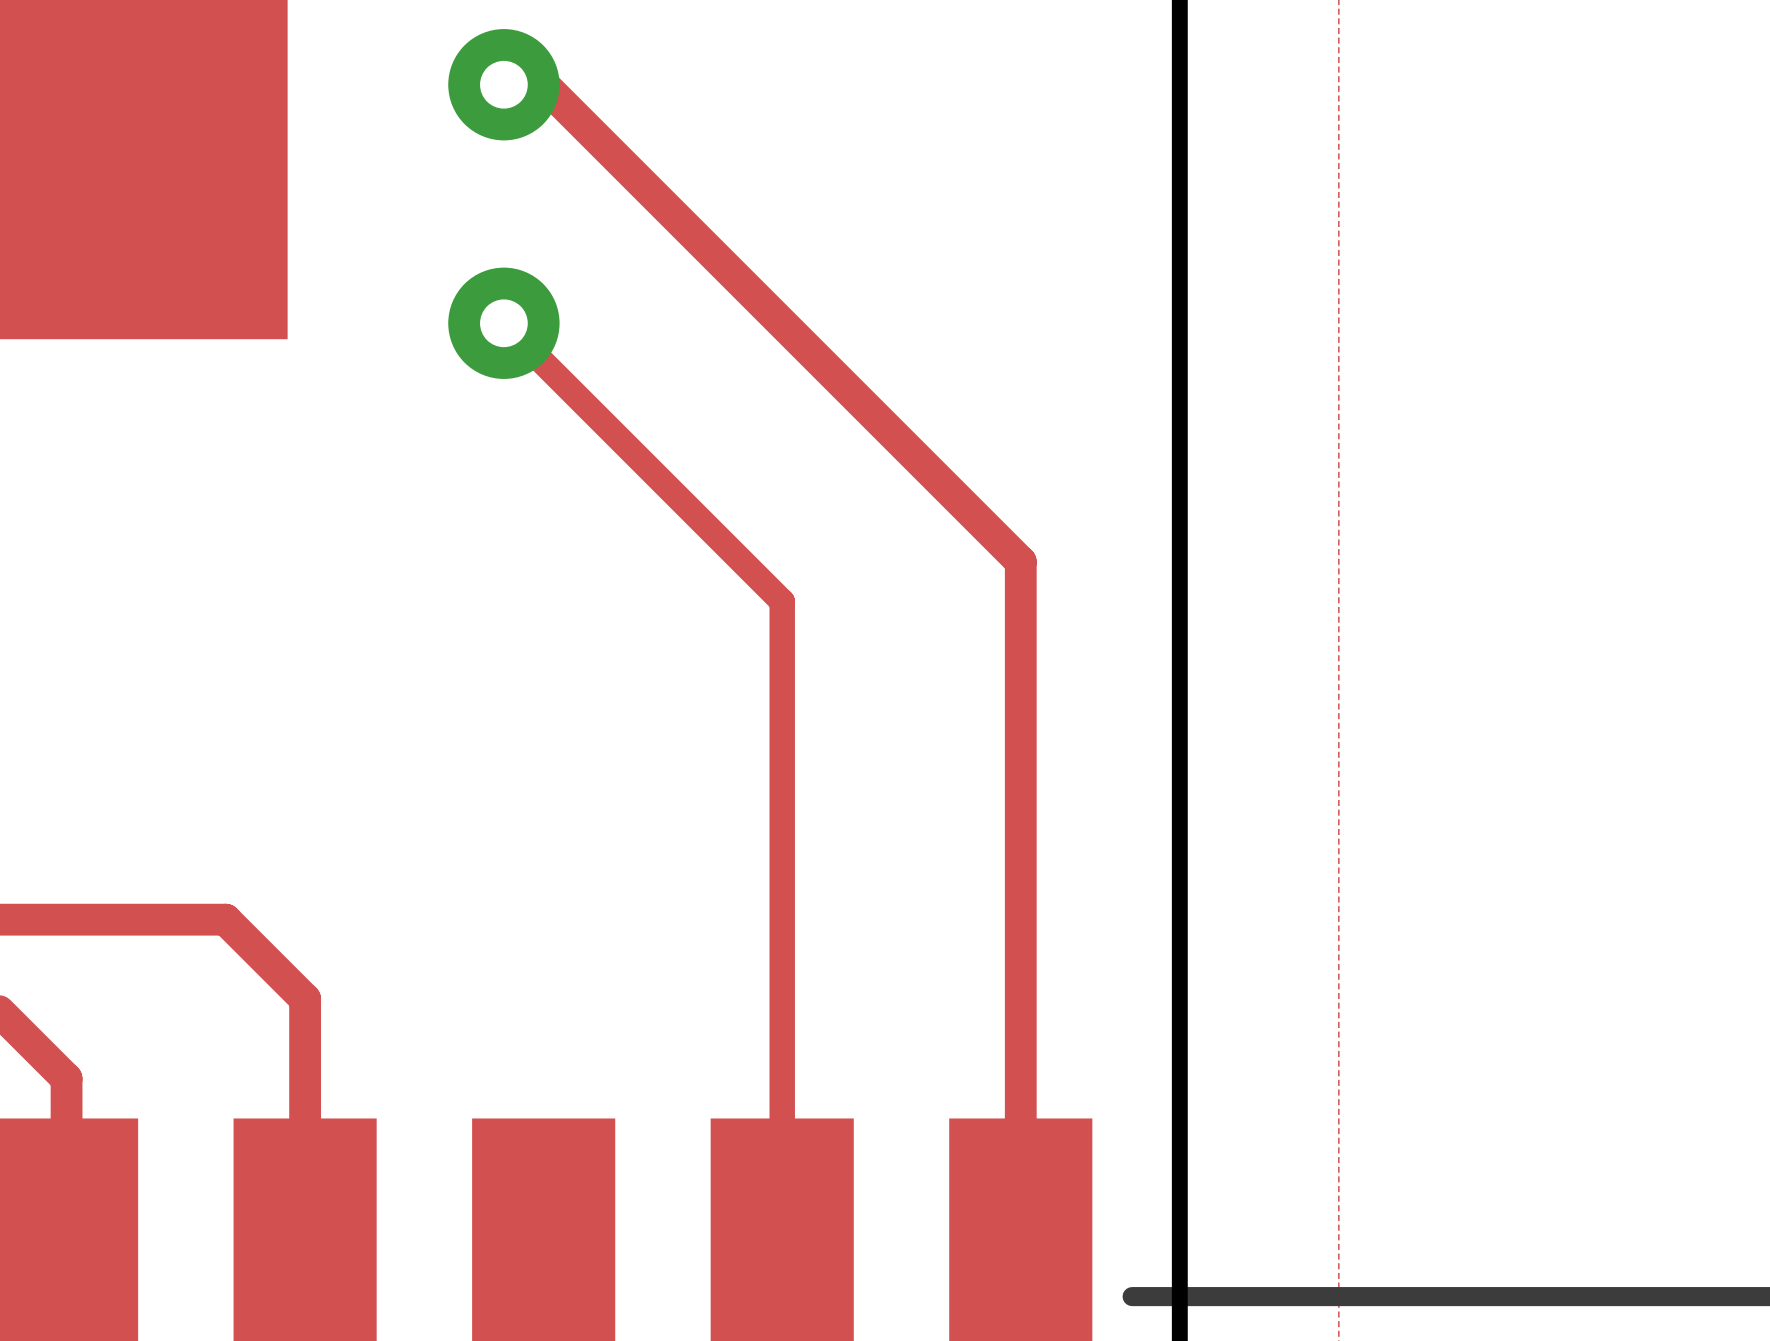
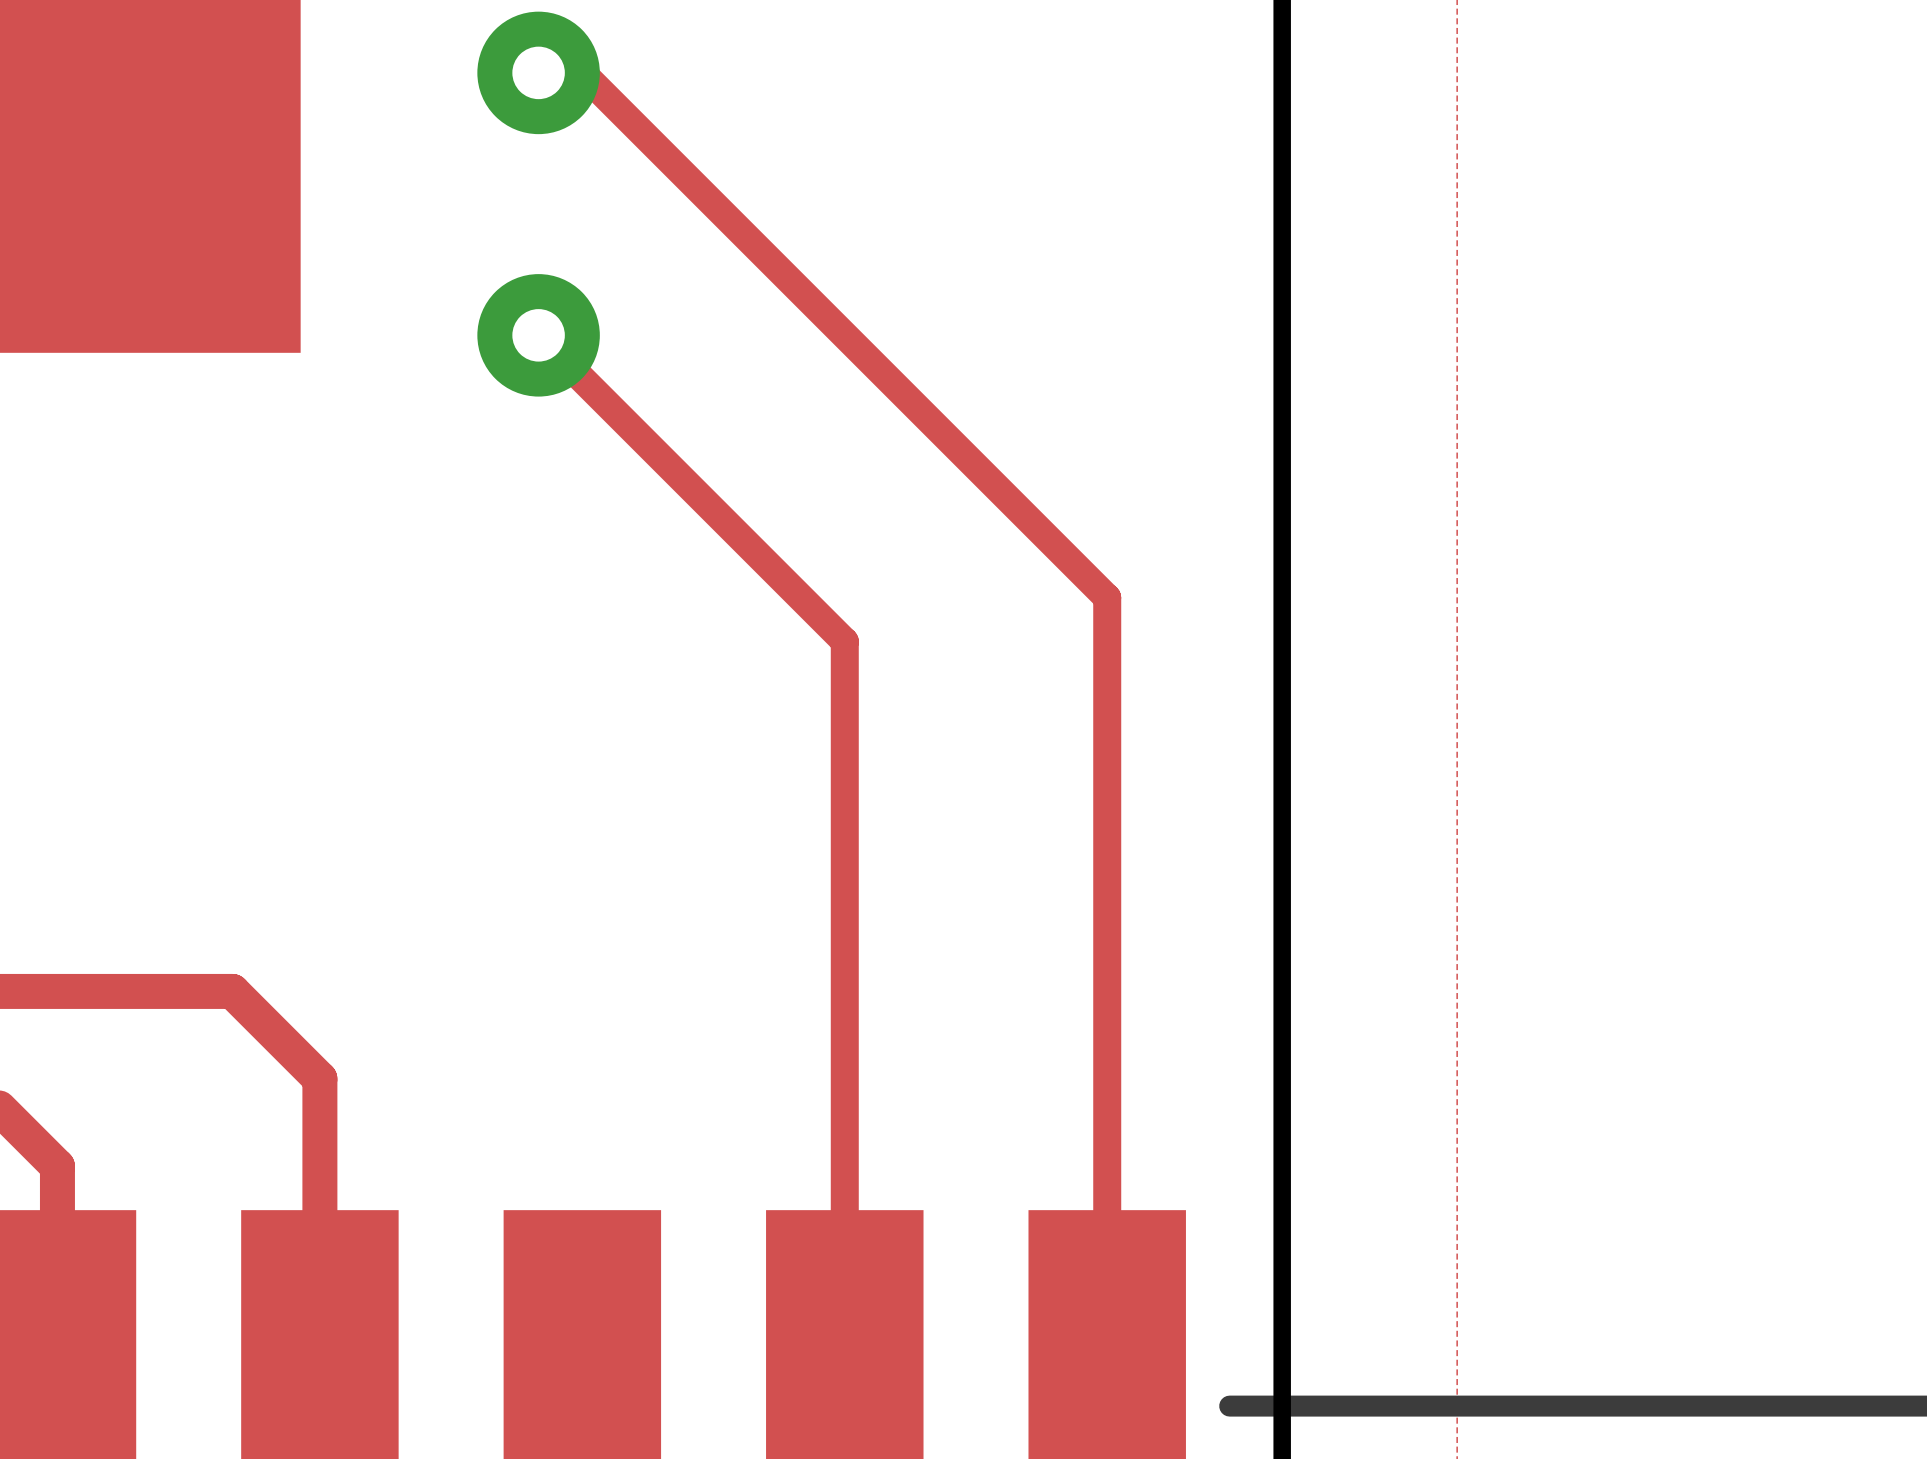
track width: thick (503, 84) (543, 84) (1020, 561) (1020, 1237) -> thin (538, 72) (582, 72) (1107, 597) (1107, 1341)

